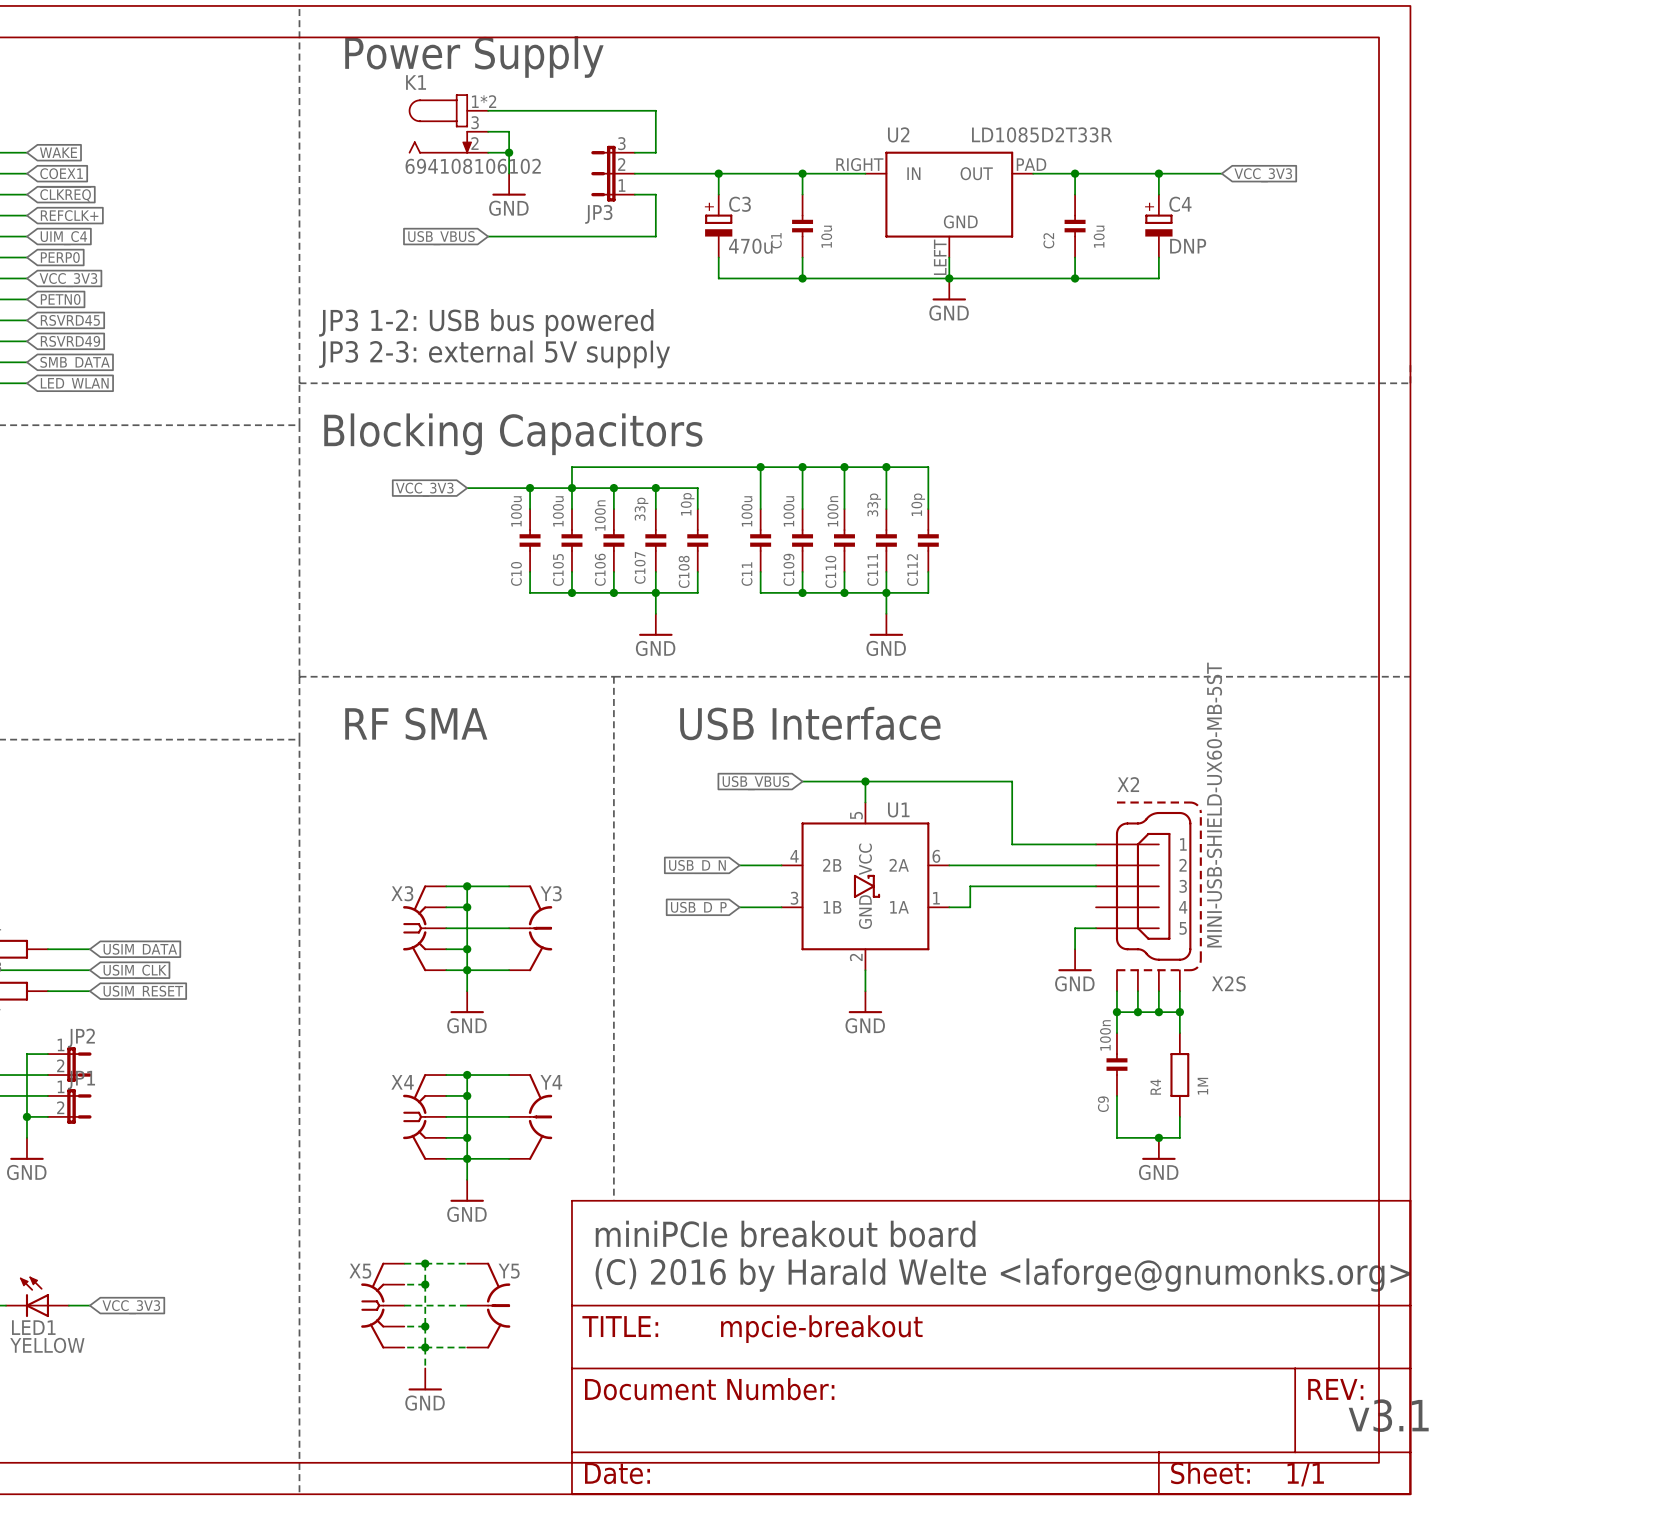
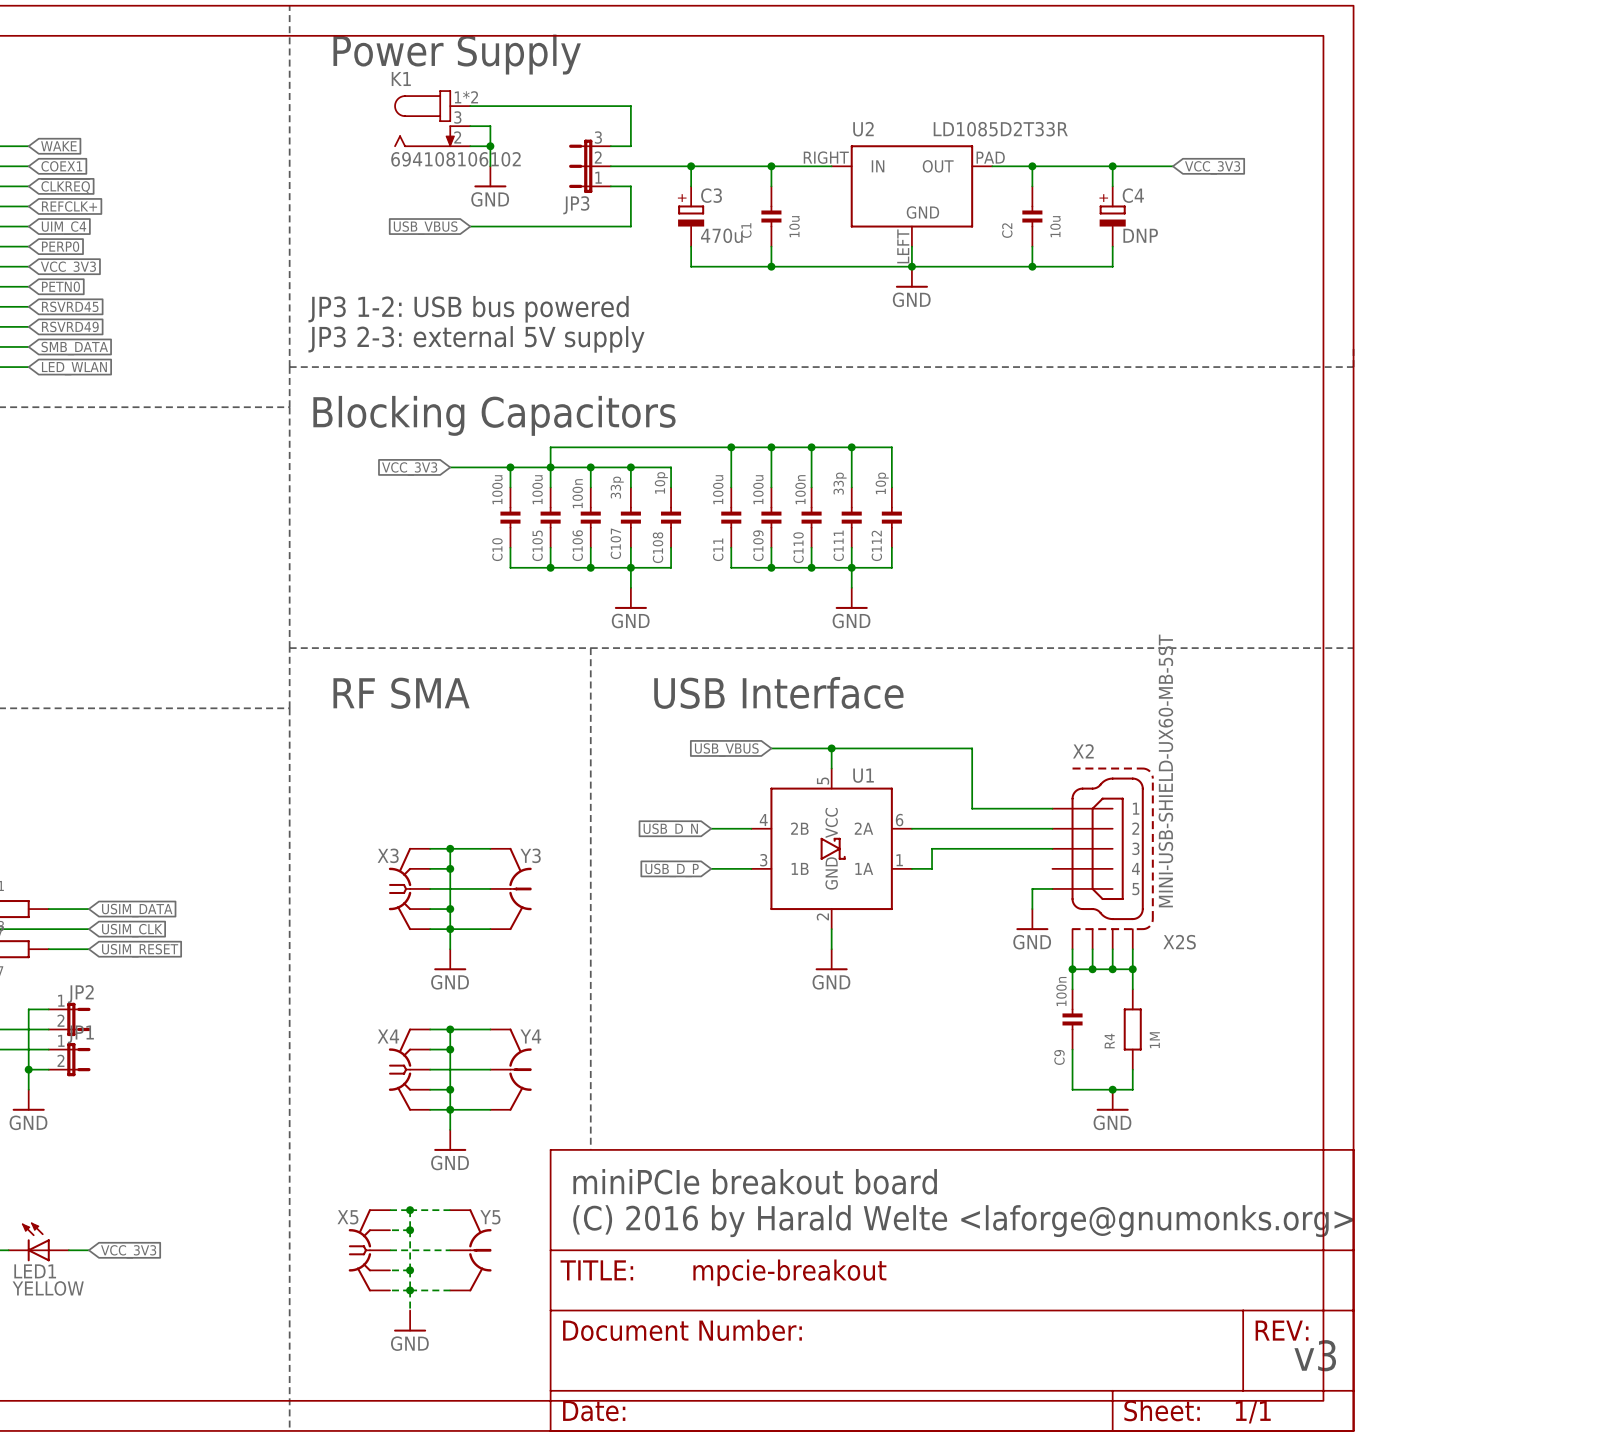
text: v3.1 (1388, 1415) -> v3 (1315, 1355)

